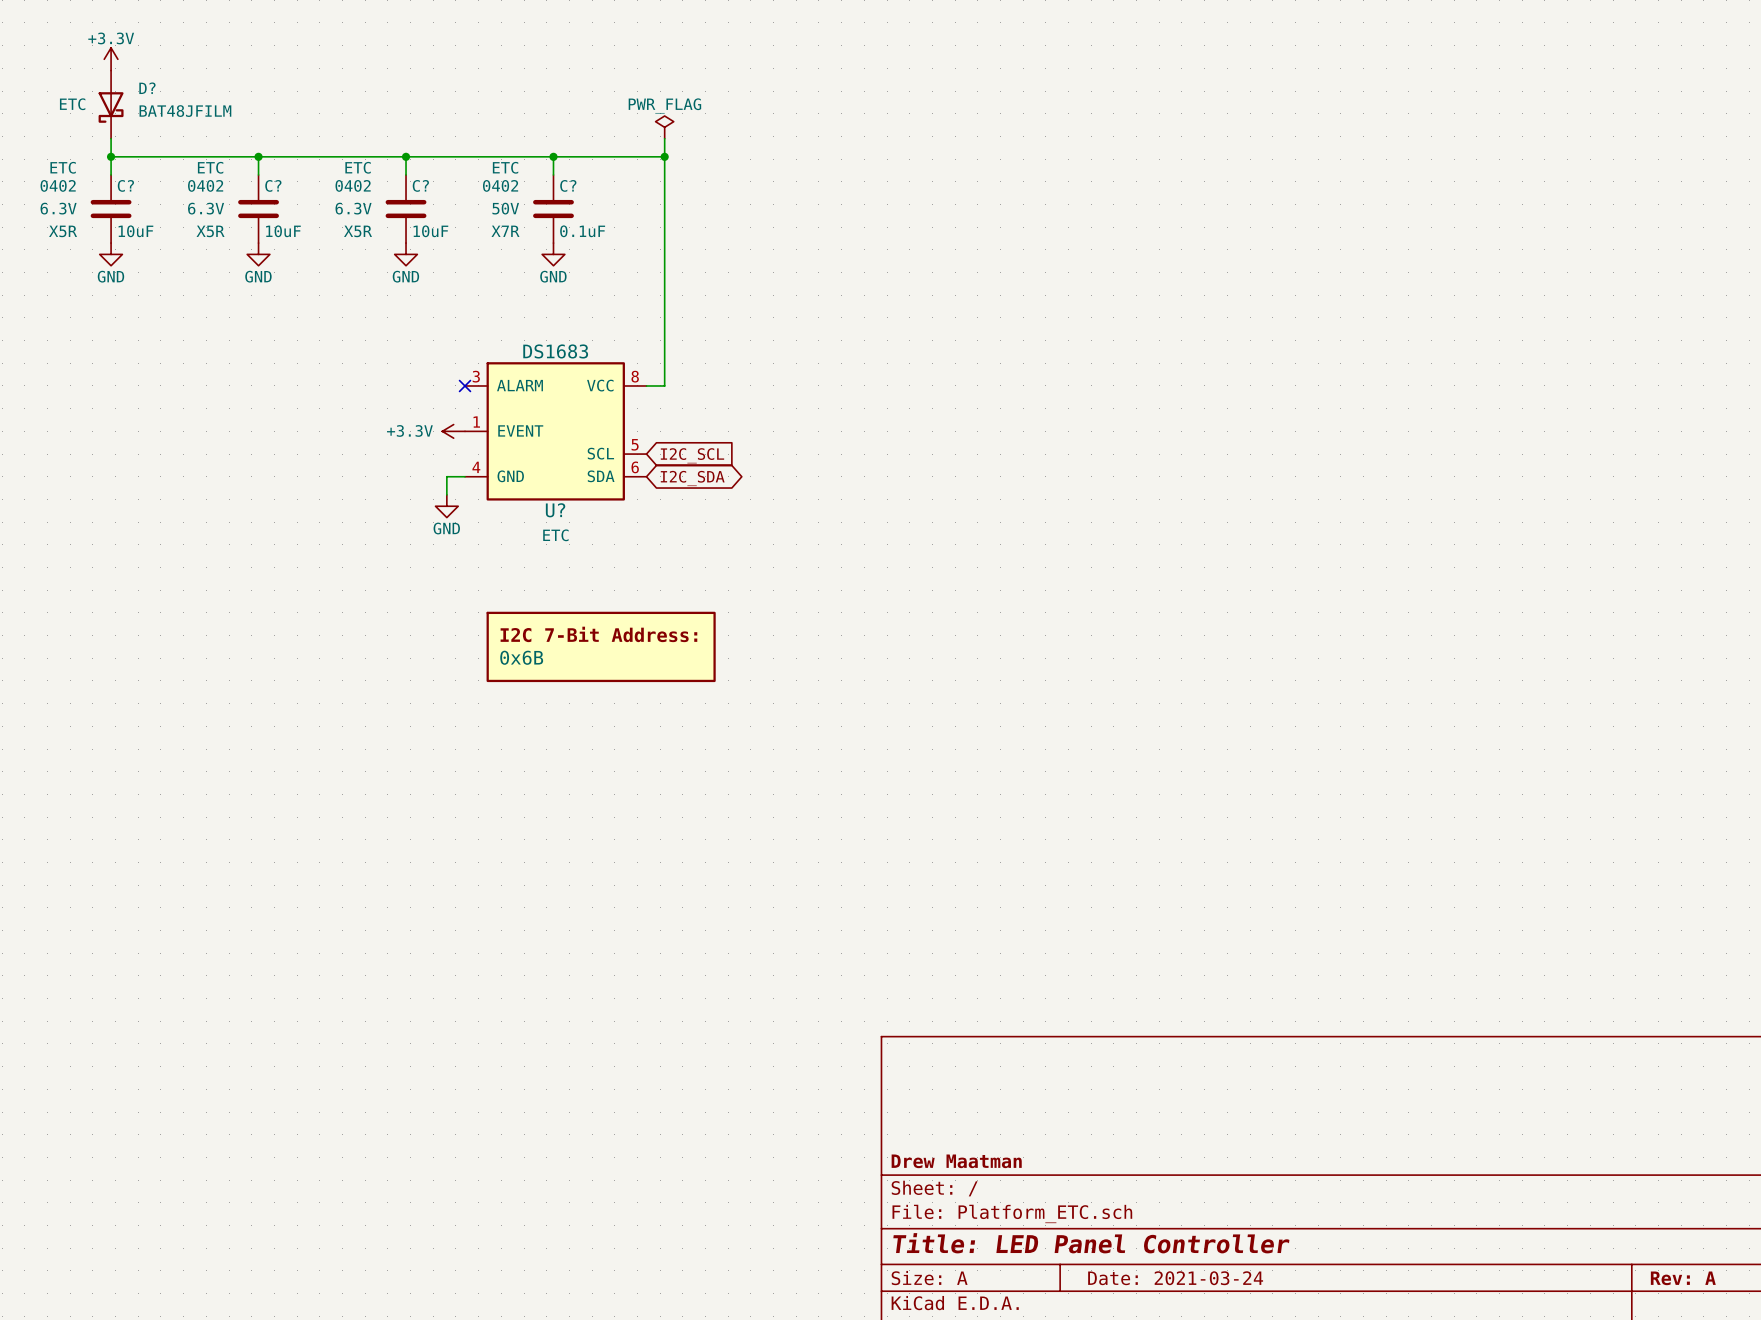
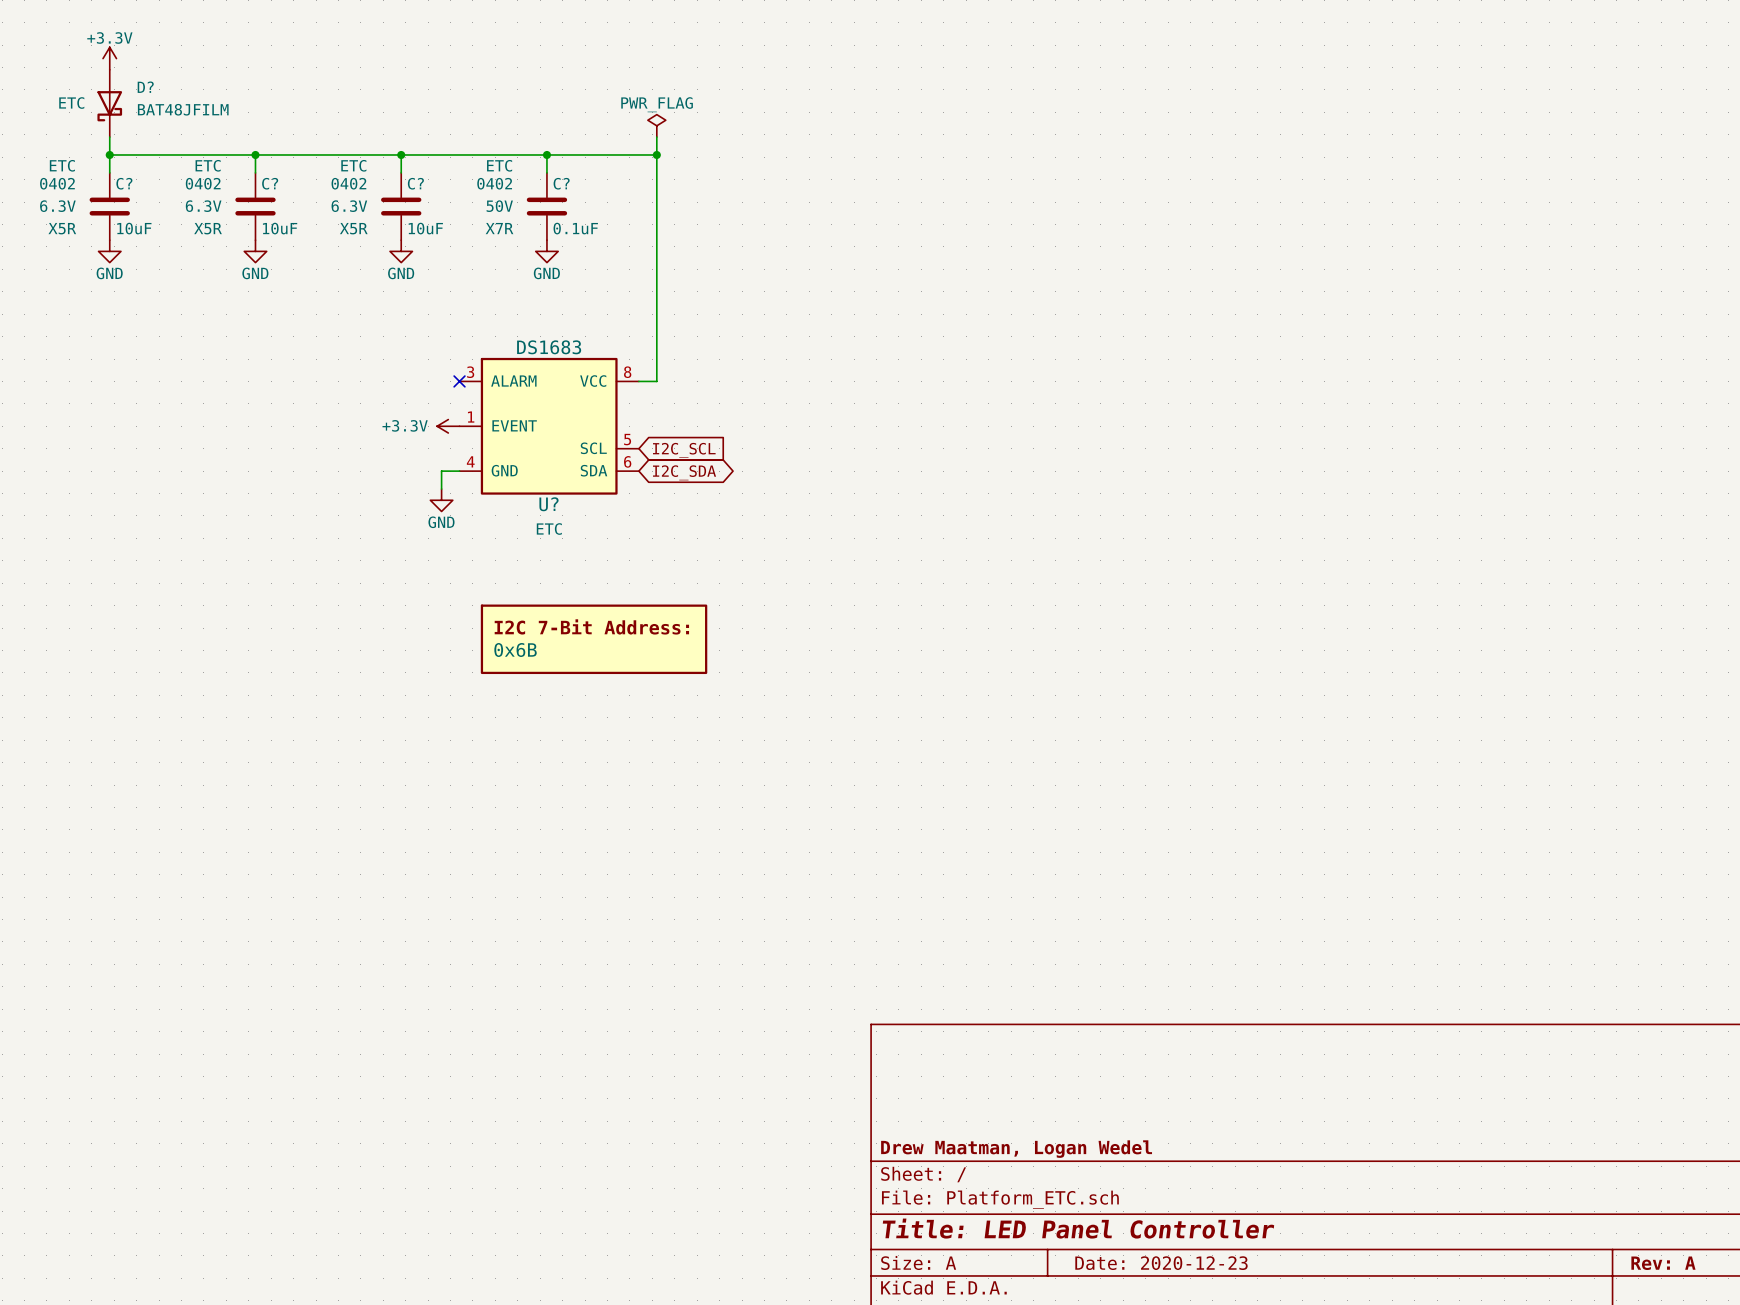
title block: Drew Maatman (956, 1161) -> Drew Maatman, Logan Wedel (1016, 1149)
title block: Date: 2021-03-24 (1175, 1278) -> Date: 2020-12-23 (1161, 1263)

